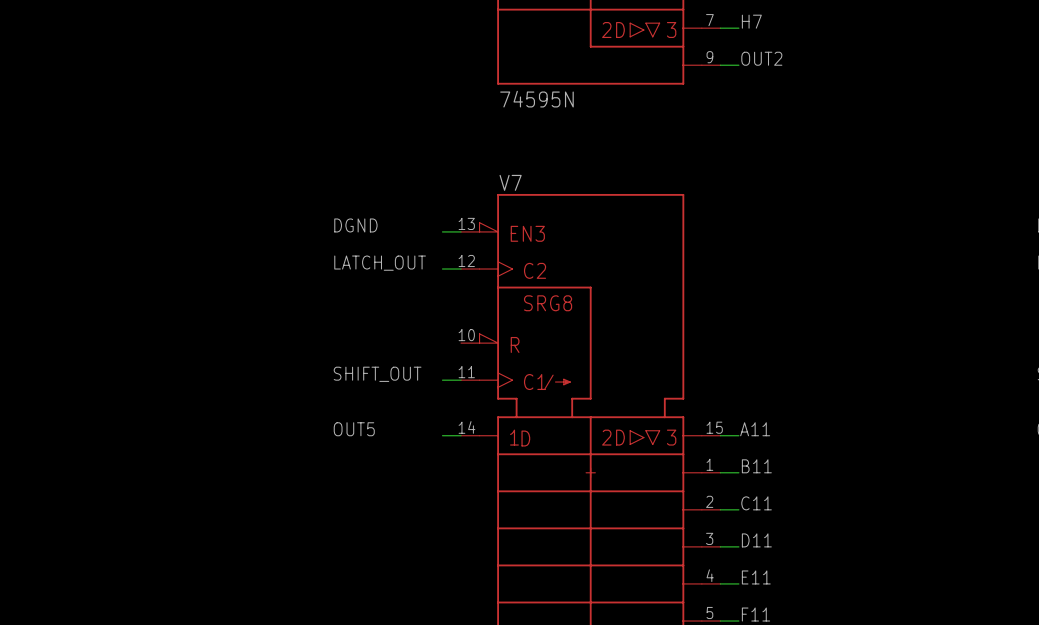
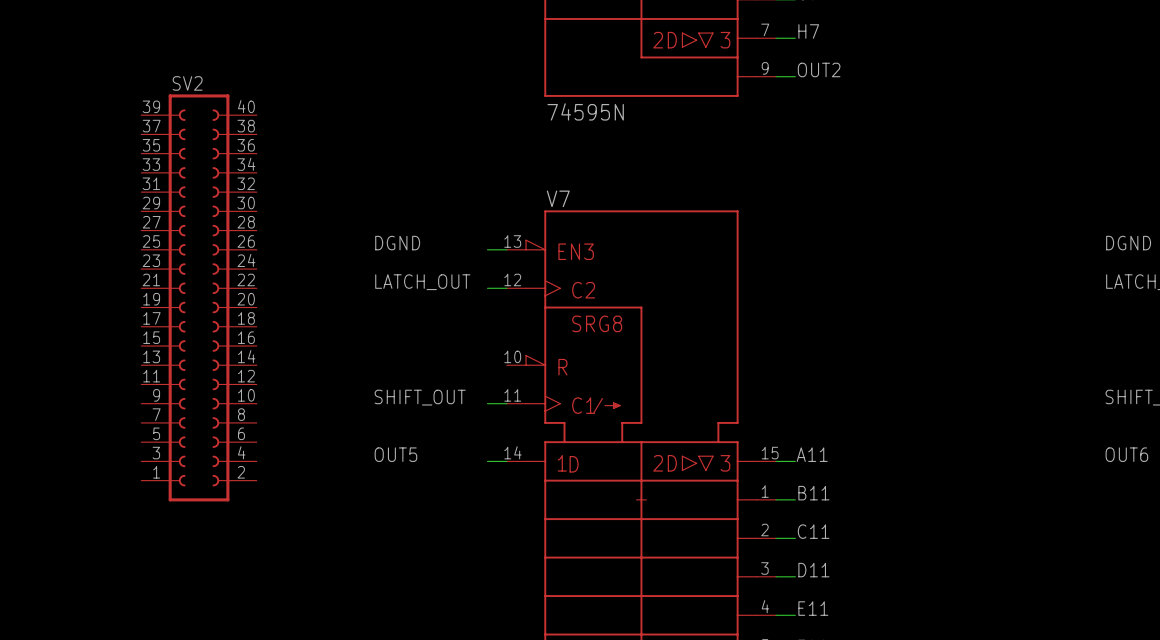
SV2: none -> (199, 297)

